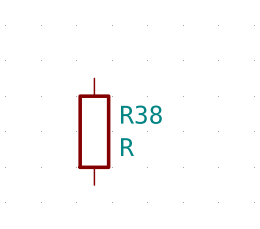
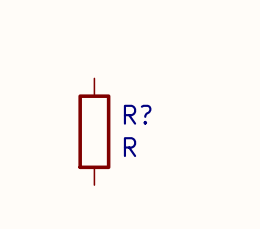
R38 name: R38 (141, 114) -> R? (137, 114)

